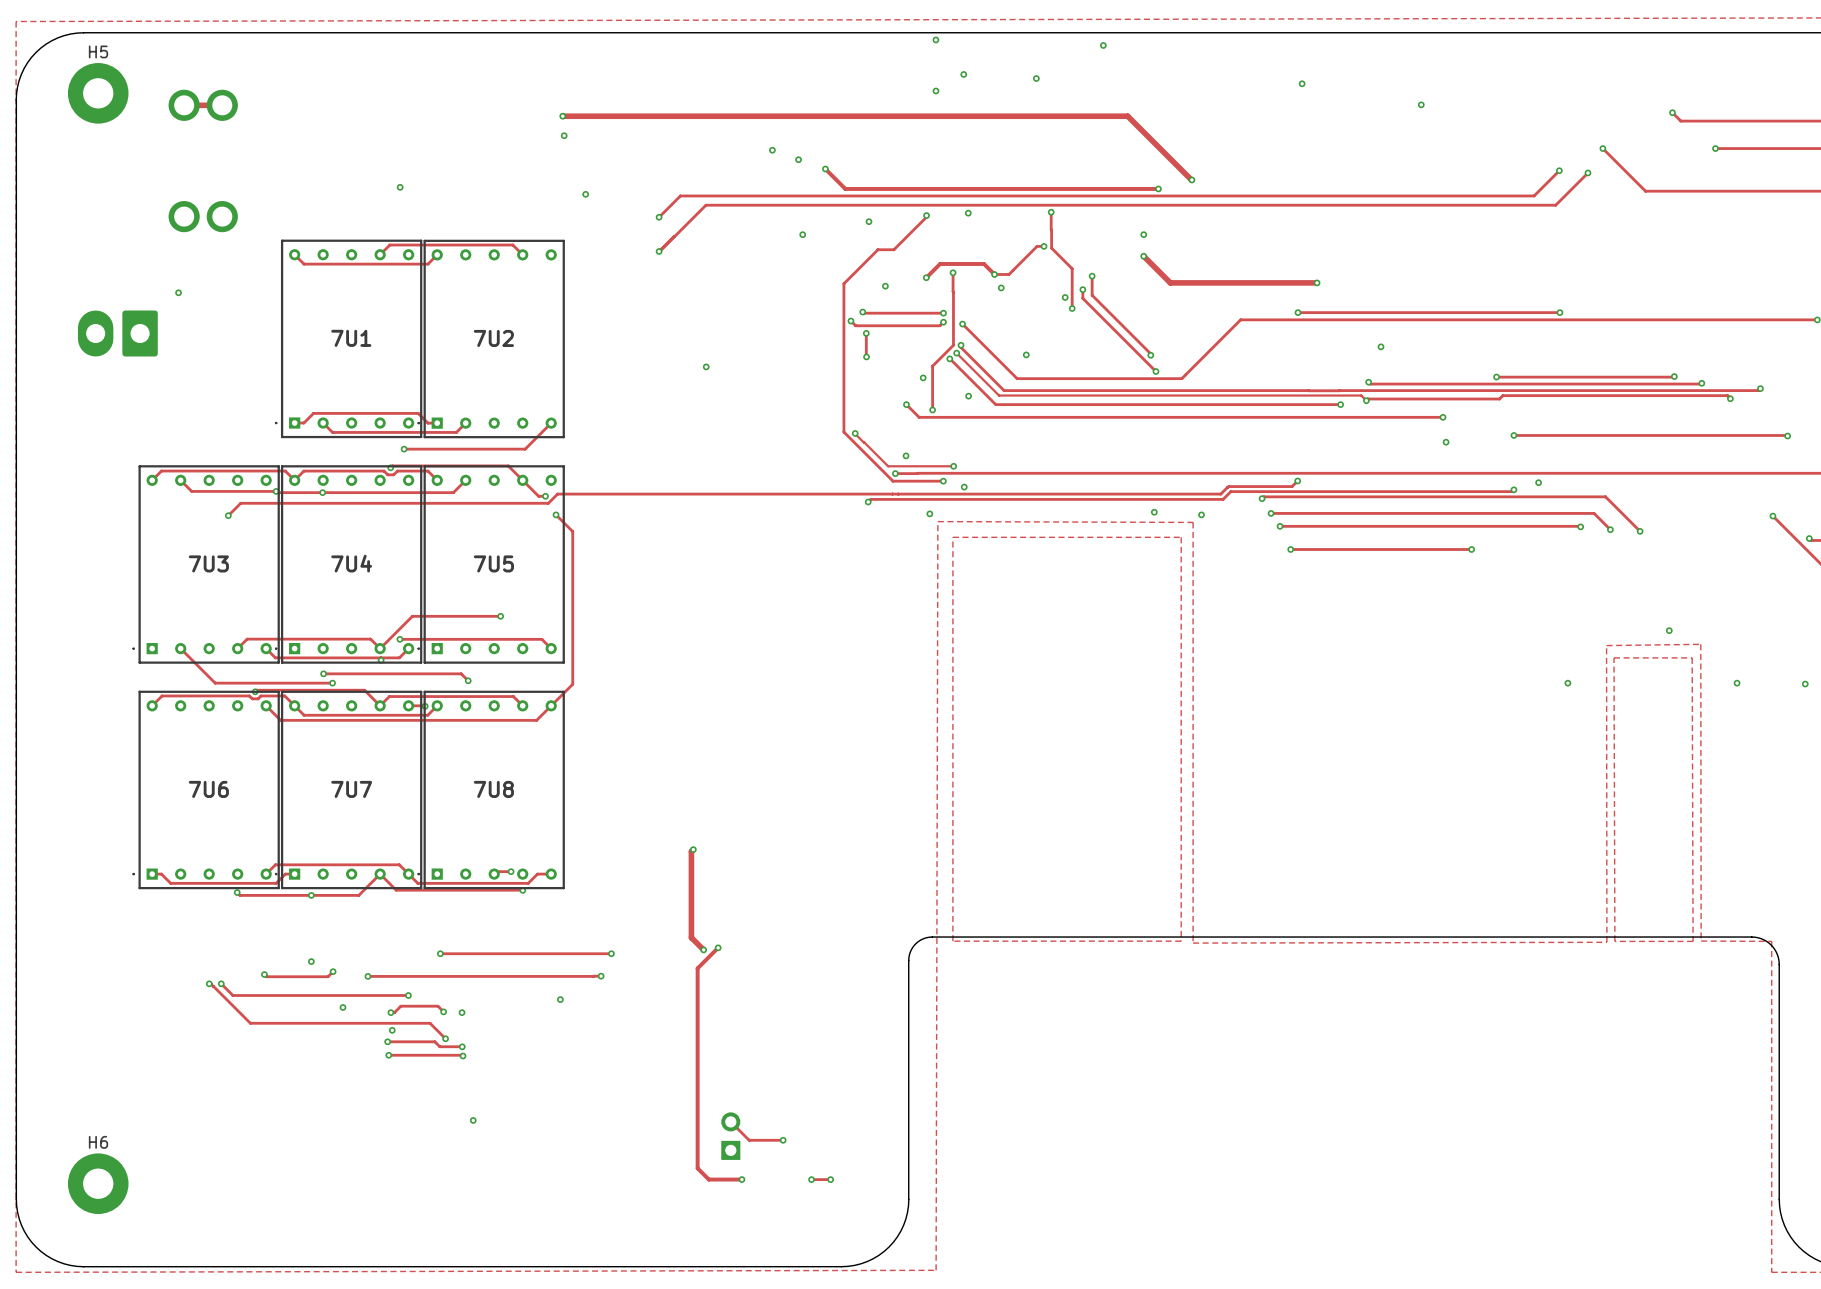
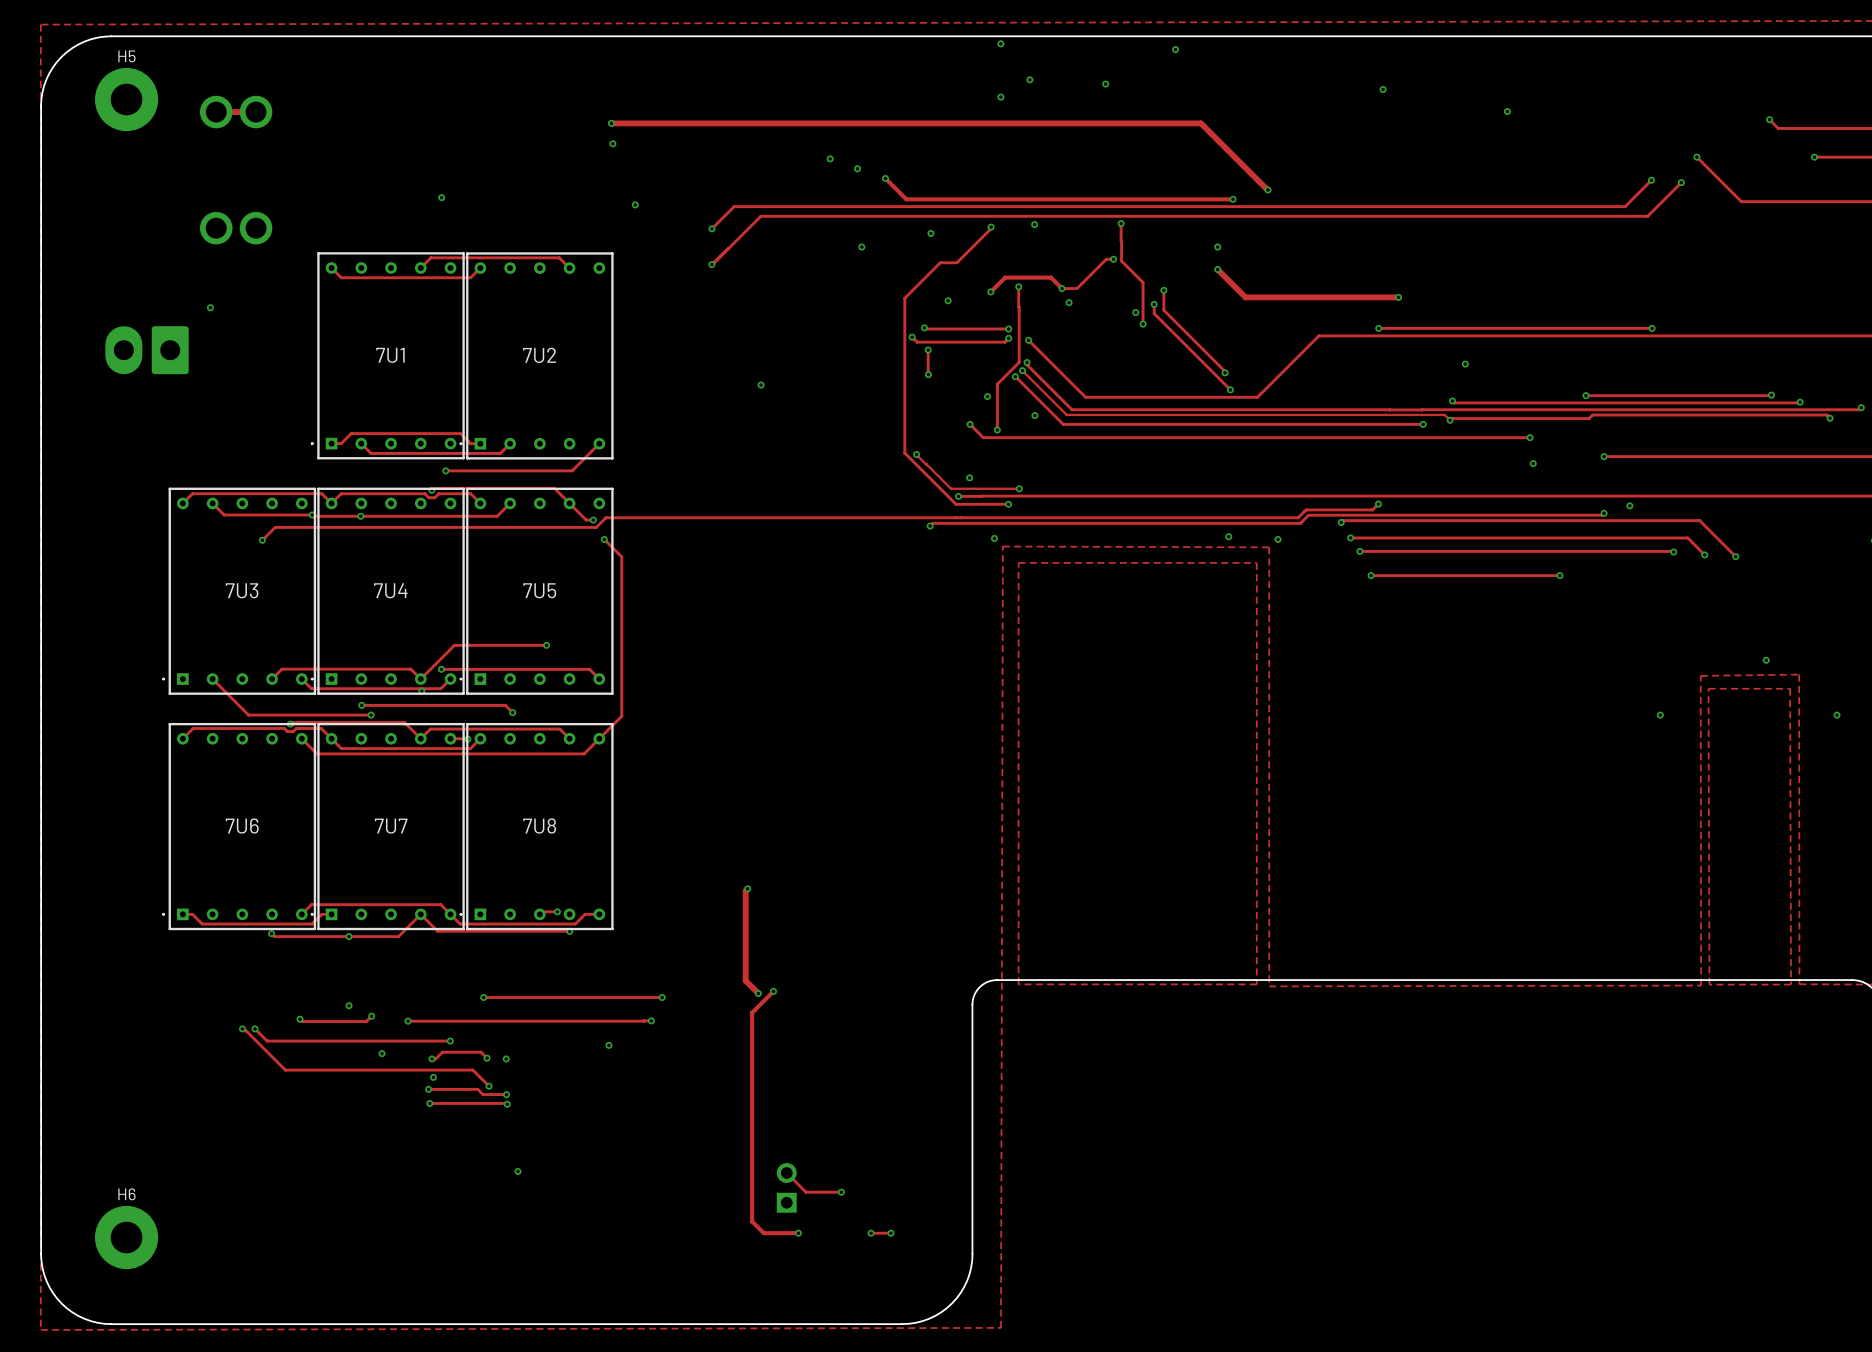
via: (1026, 354) -> none
via: (964, 487) -> none

